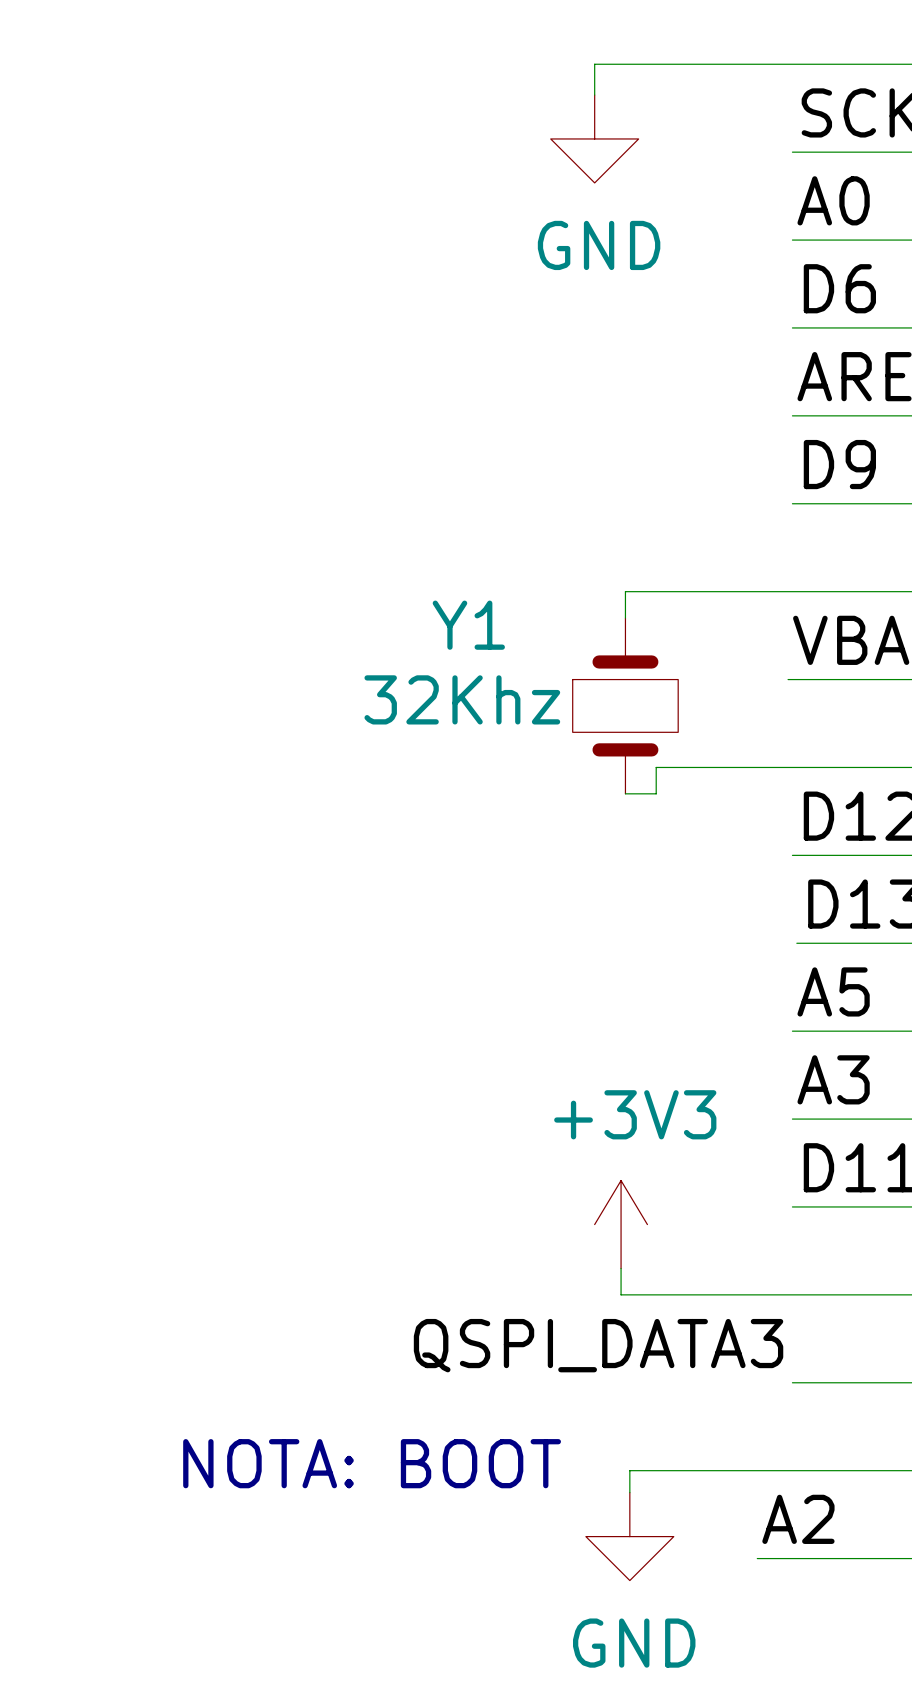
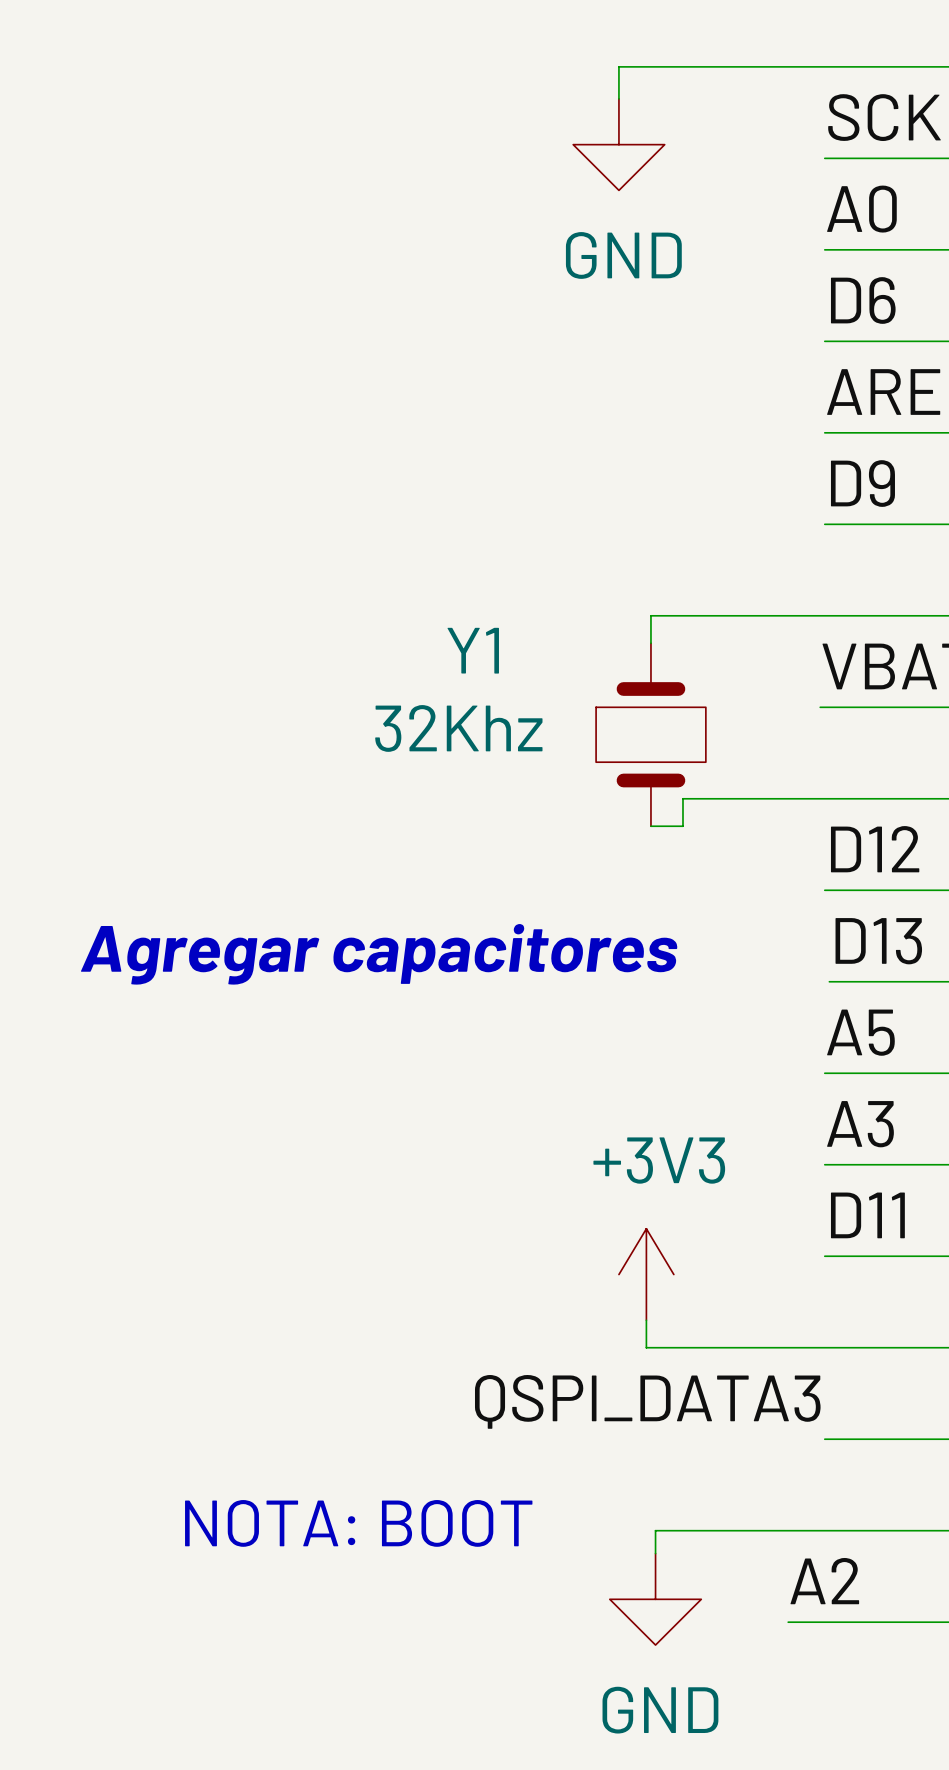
text: none -> Agregar capacitores (379, 954)

